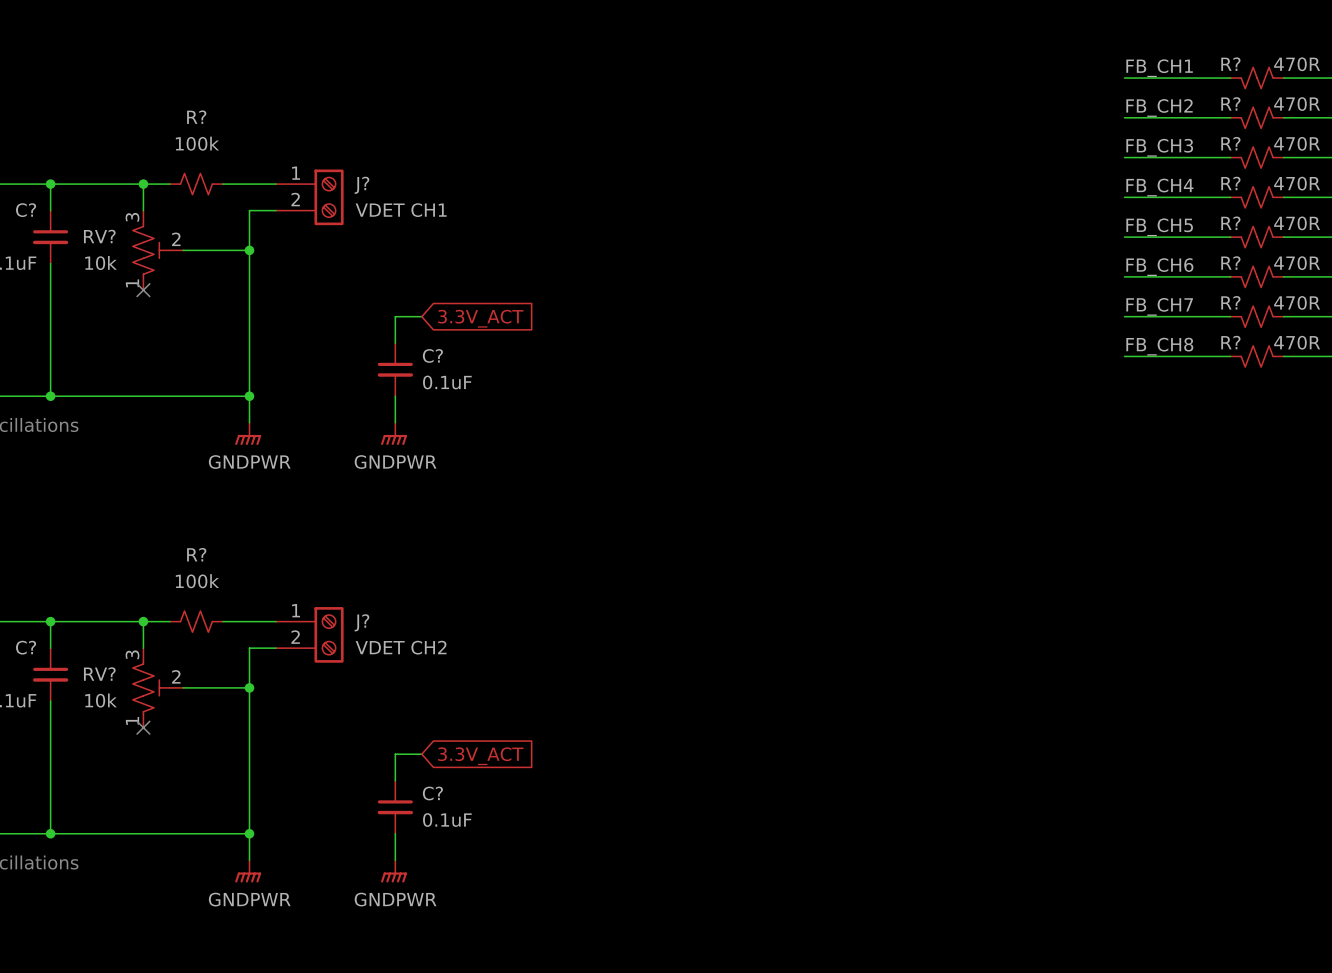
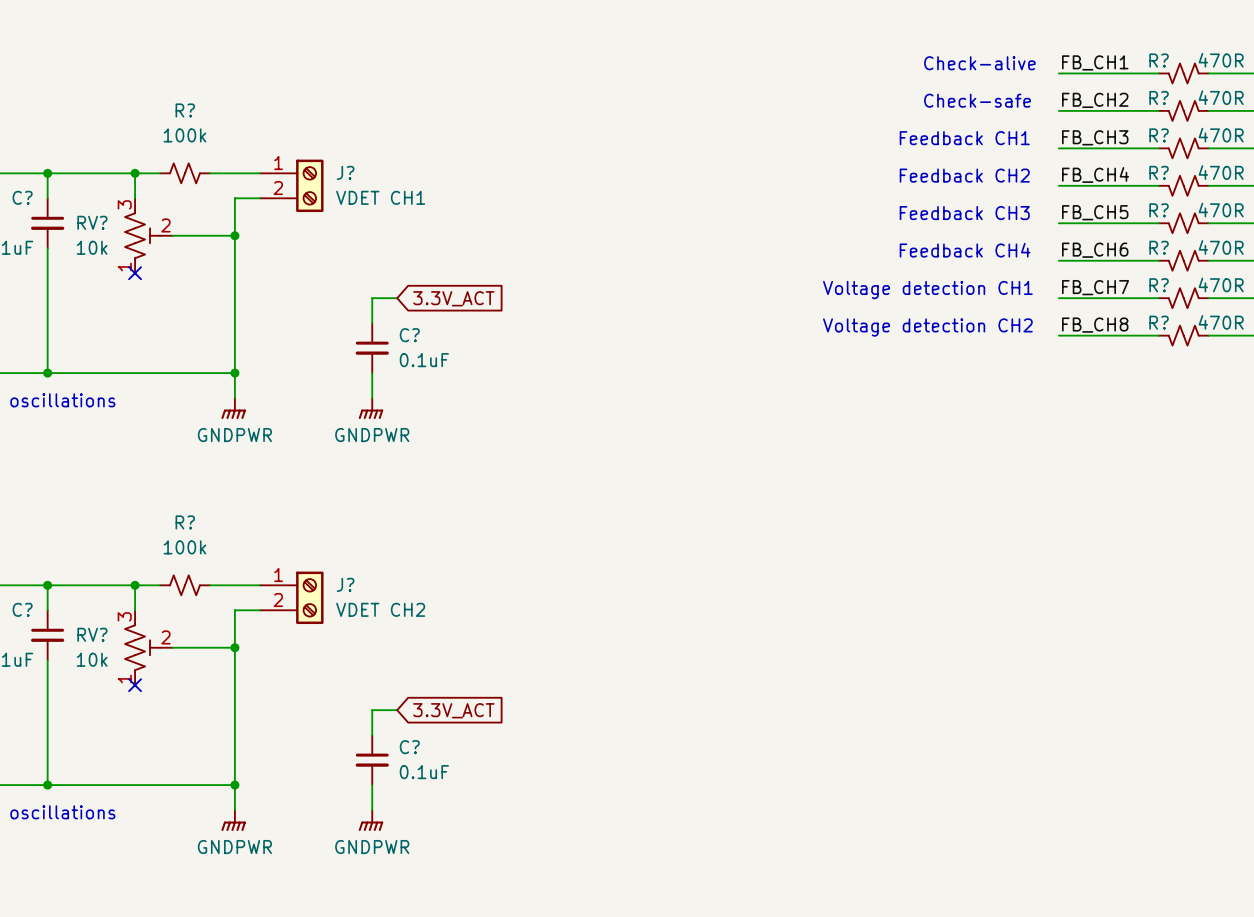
text: none -> Check-alive (979, 63)
text: none -> Check-safe (977, 100)
text: none -> Feedback CH1 (964, 138)
text: none -> Feedback CH2 (964, 175)
text: none -> Feedback CH3 (964, 213)
text: none -> Feedback CH4 (965, 250)
text: none -> Voltage detection CH1 (927, 290)
text: none -> Voltage detection CH2 (927, 327)

